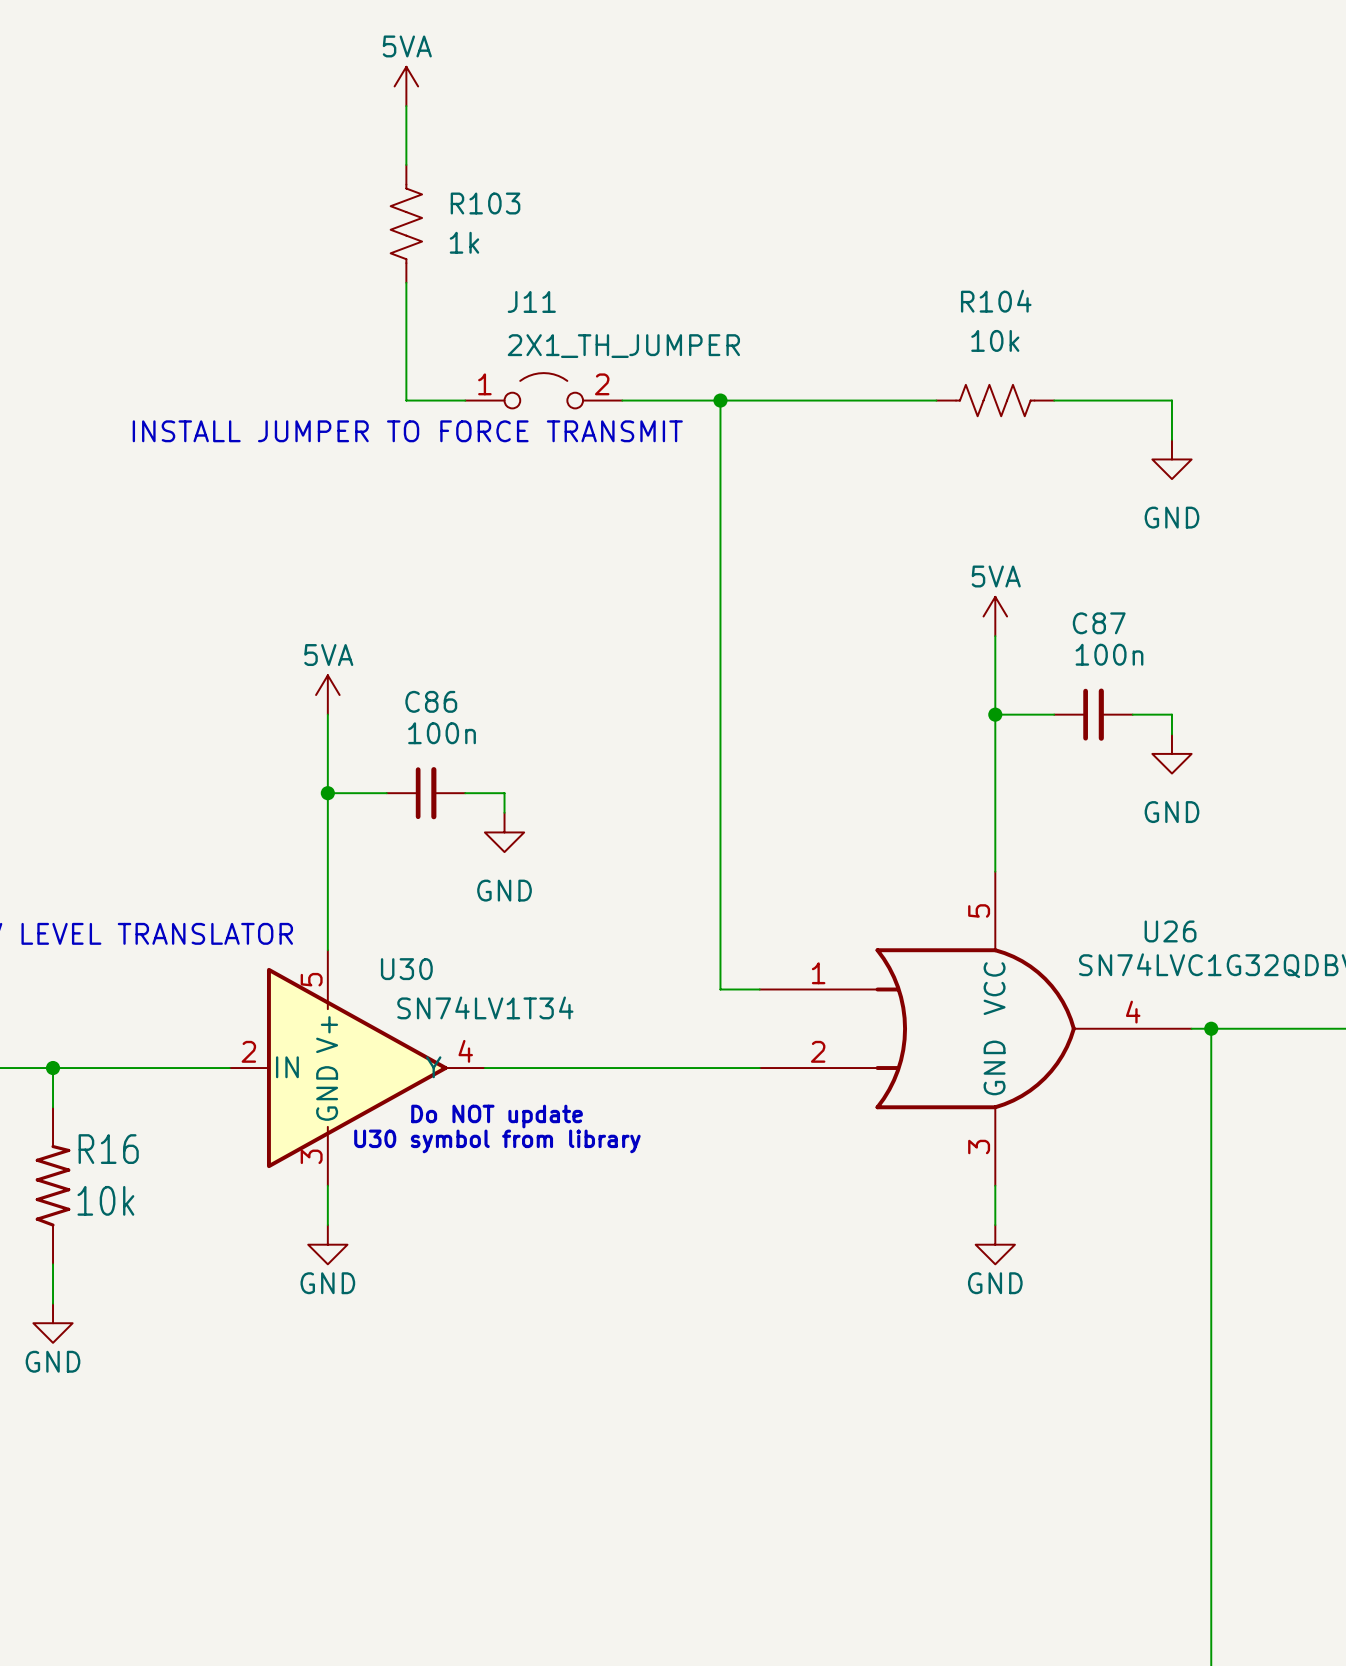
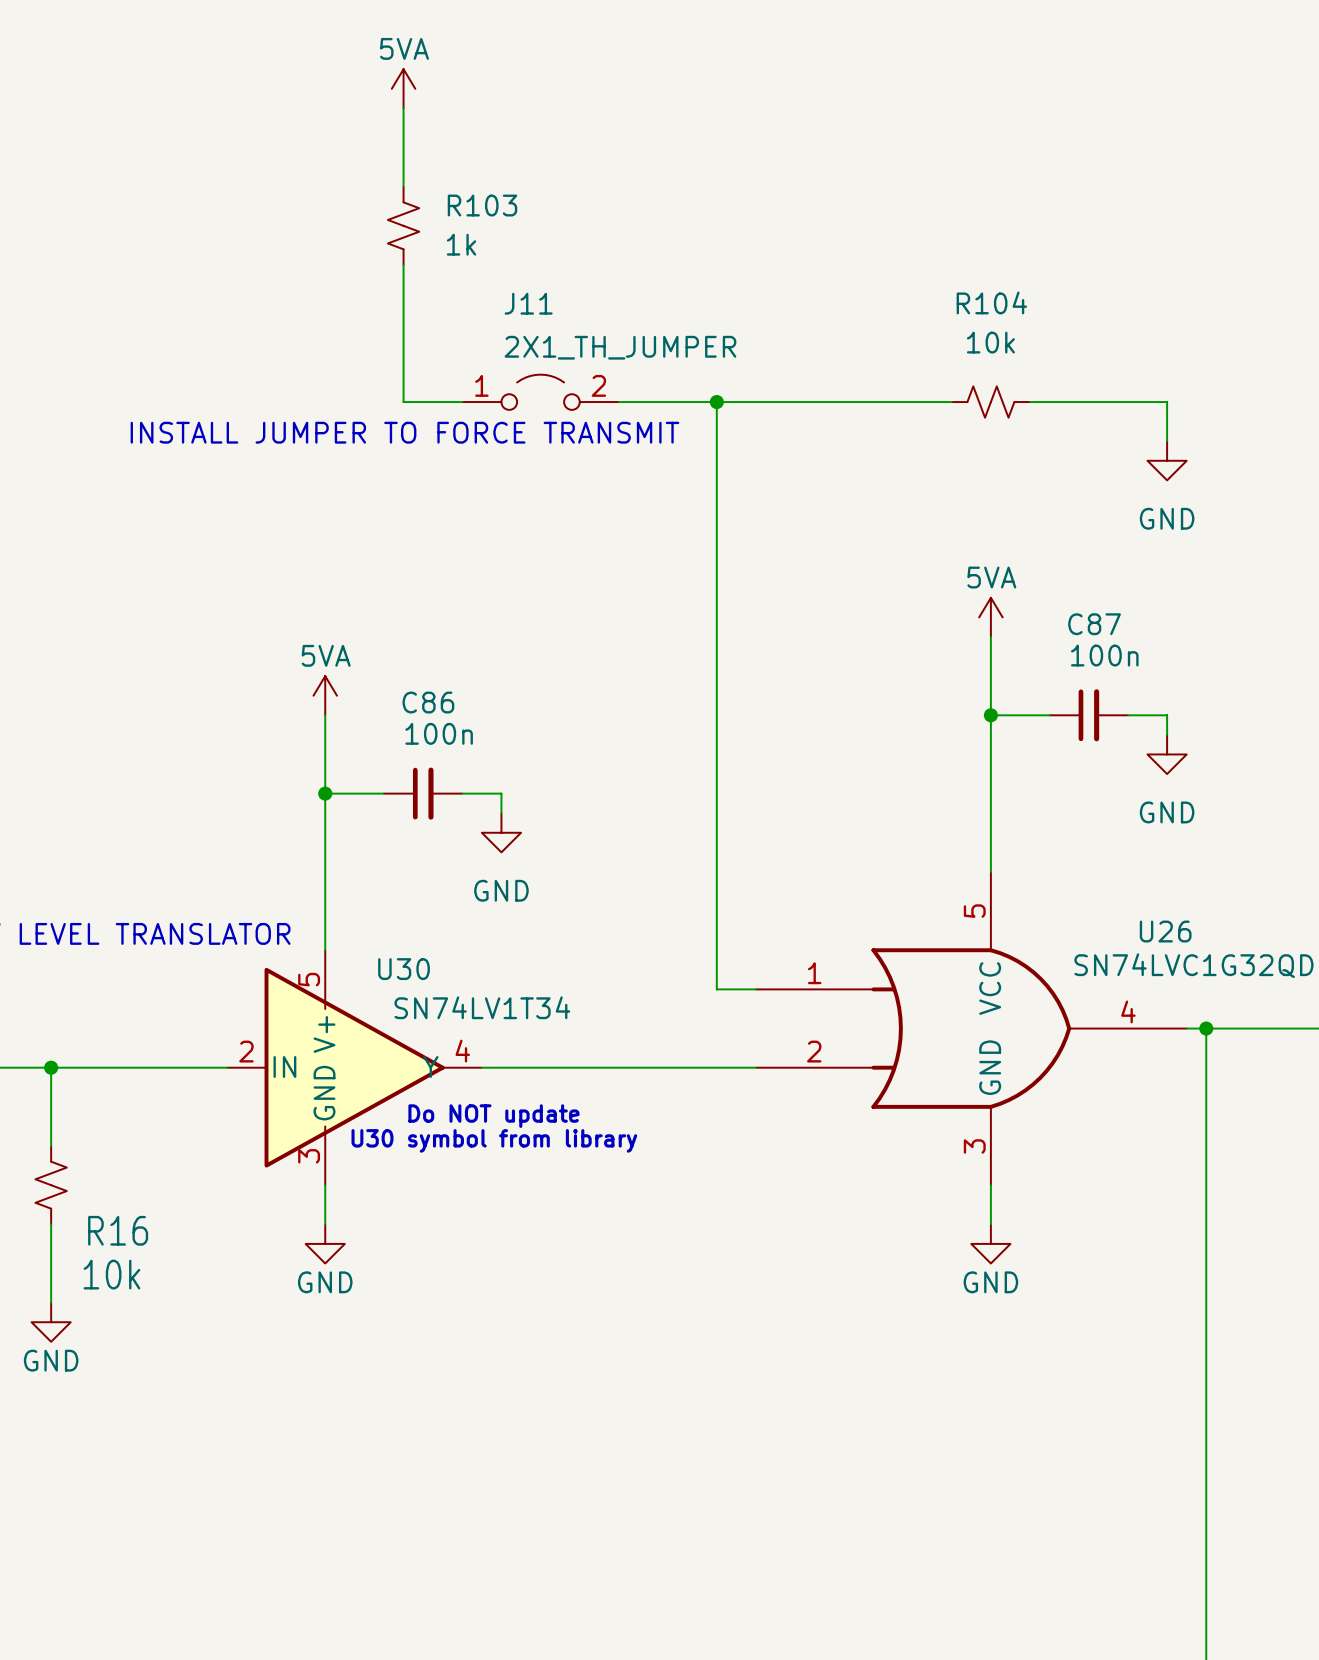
R103 symbol: [390, 164, 423, 283] -> [387, 186, 420, 266]
R104 symbol: [936, 384, 1055, 417] -> [951, 386, 1031, 418]
R16 symbol: [35, 1107, 71, 1265] -> [35, 1146, 67, 1225]
R16 name position: R16 (108, 1149) -> R16 (118, 1230)
R16 value position: 10k (105, 1200) -> 10k (111, 1274)

